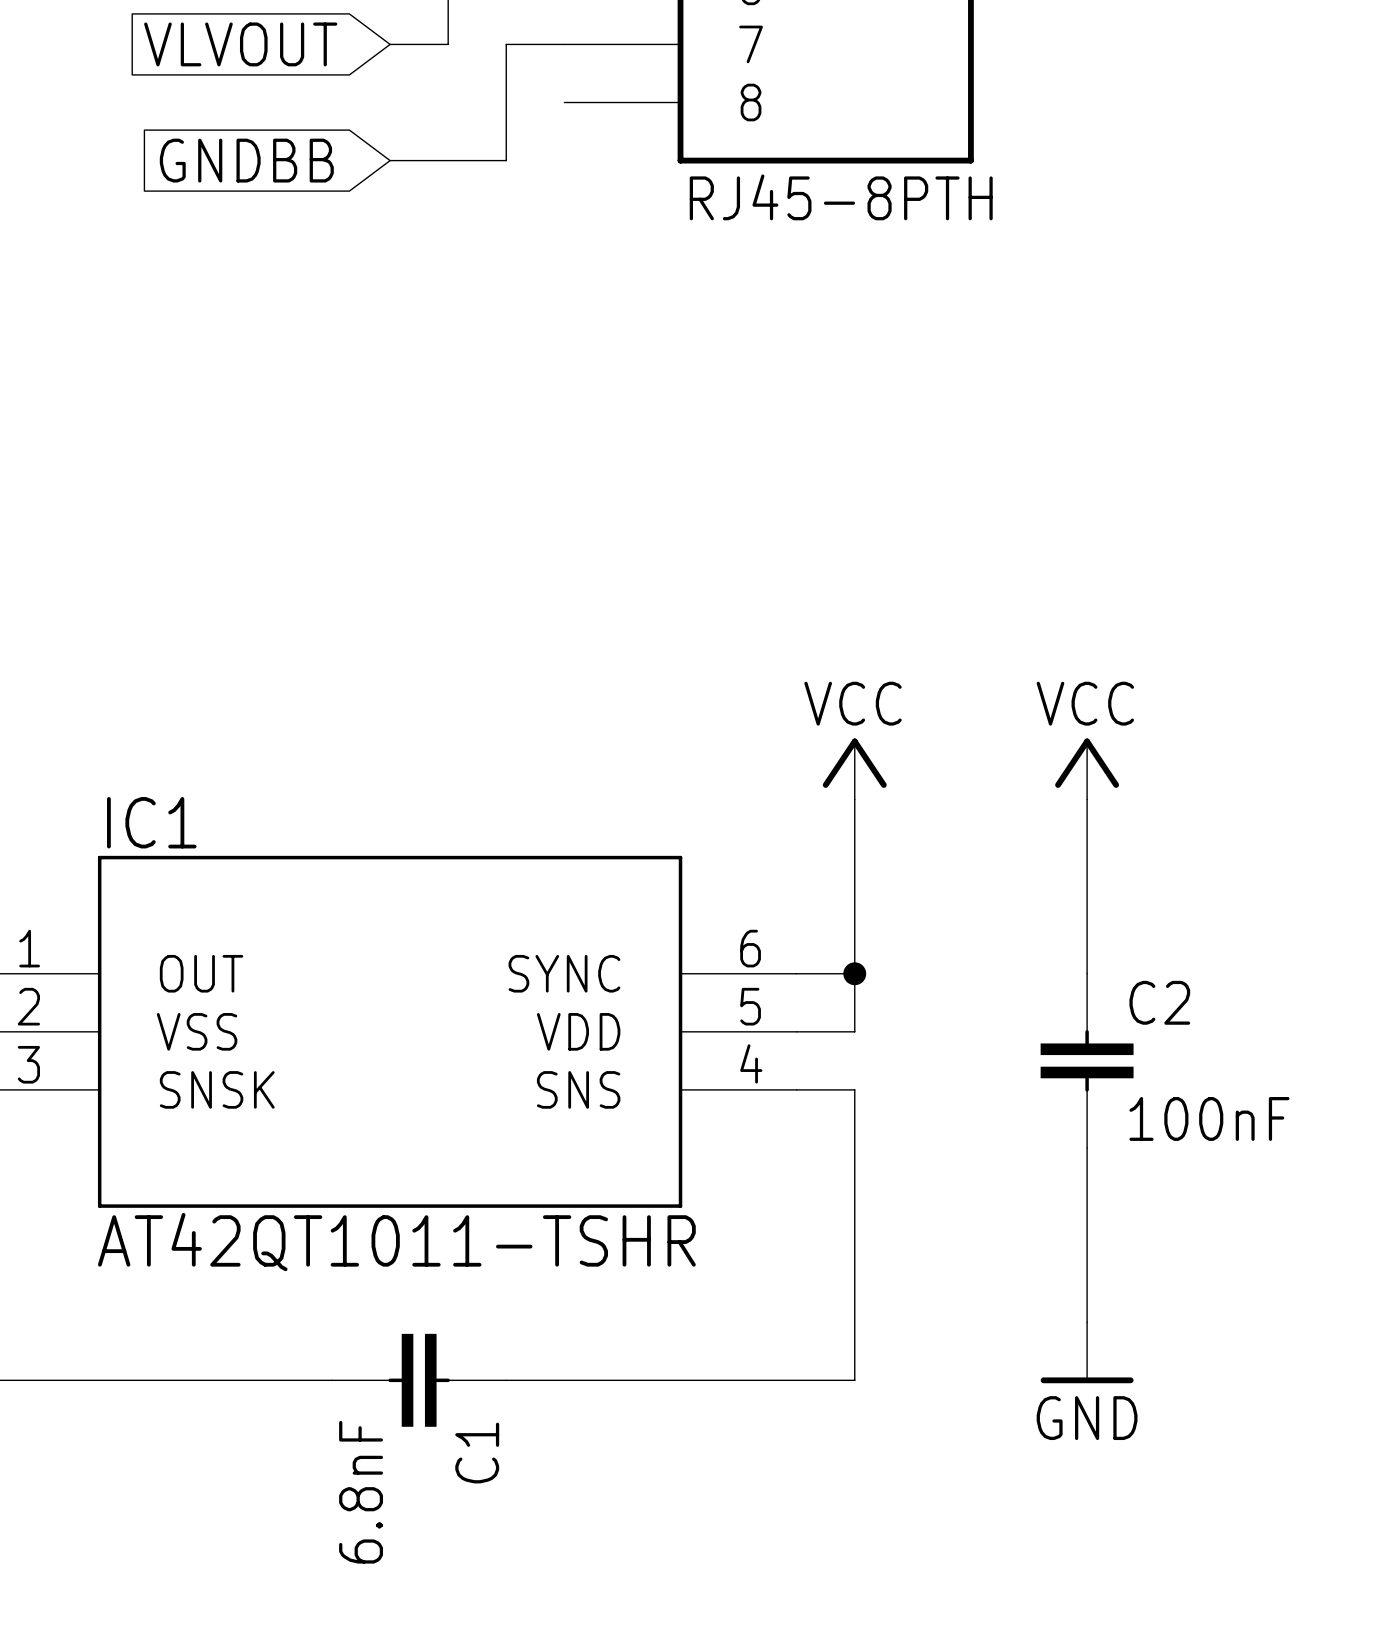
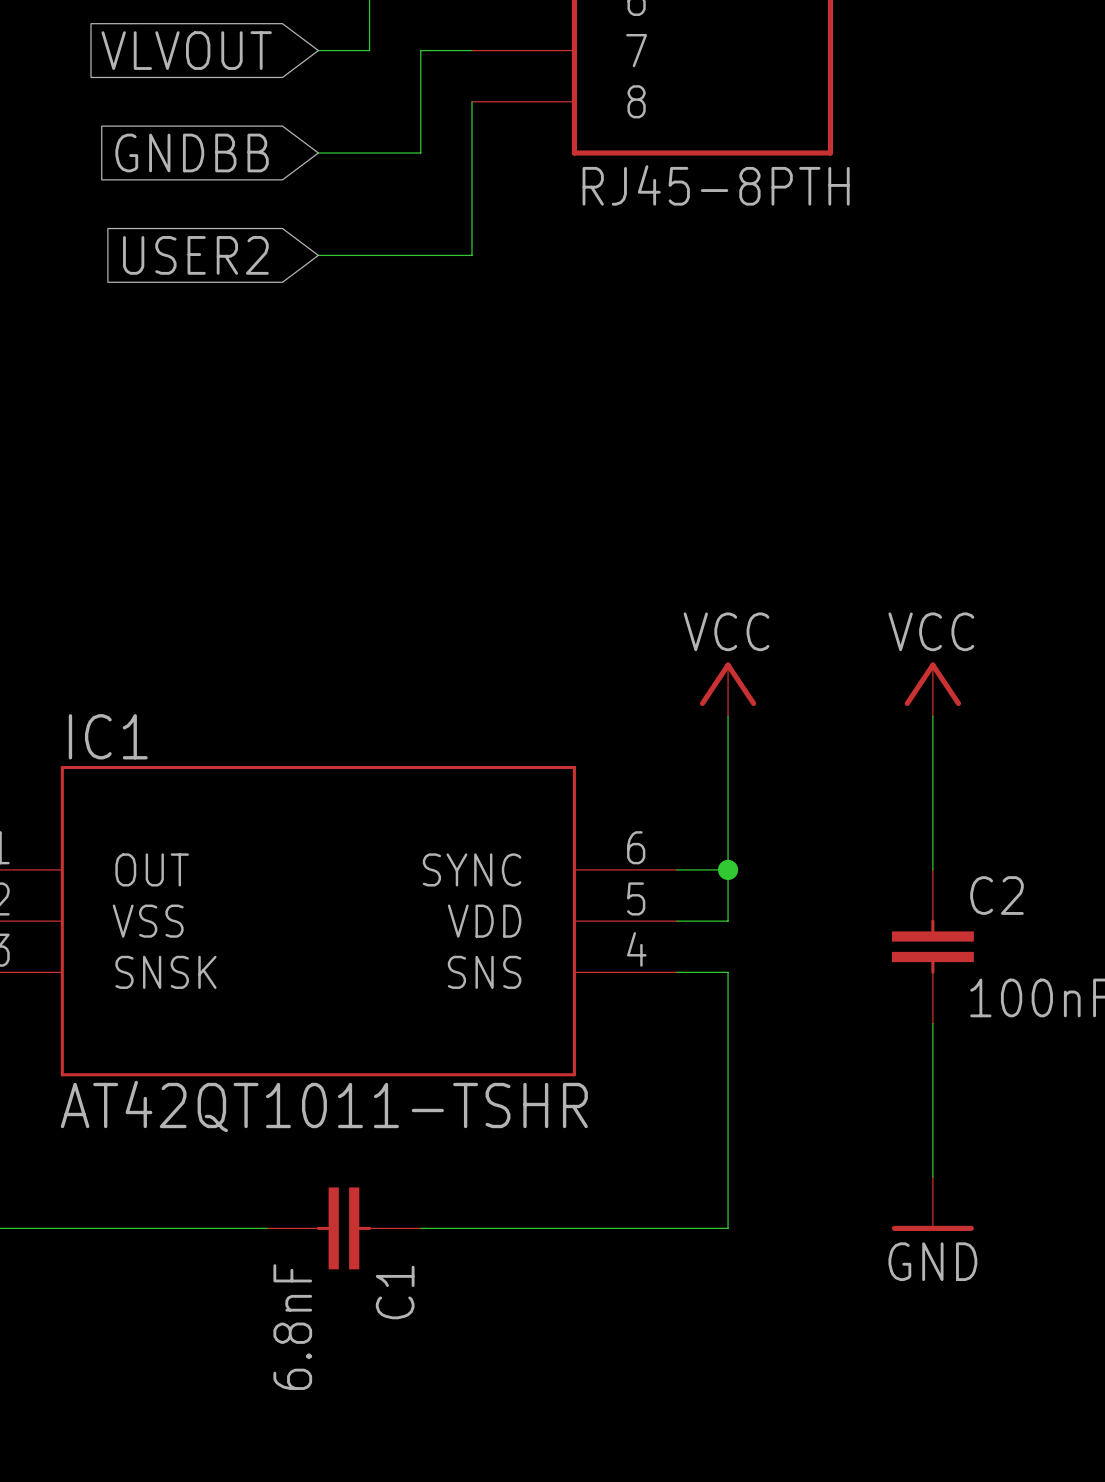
wire: none -> (471, 101) (471, 255) (318, 255)
global label: none -> USER2 (195, 255)

